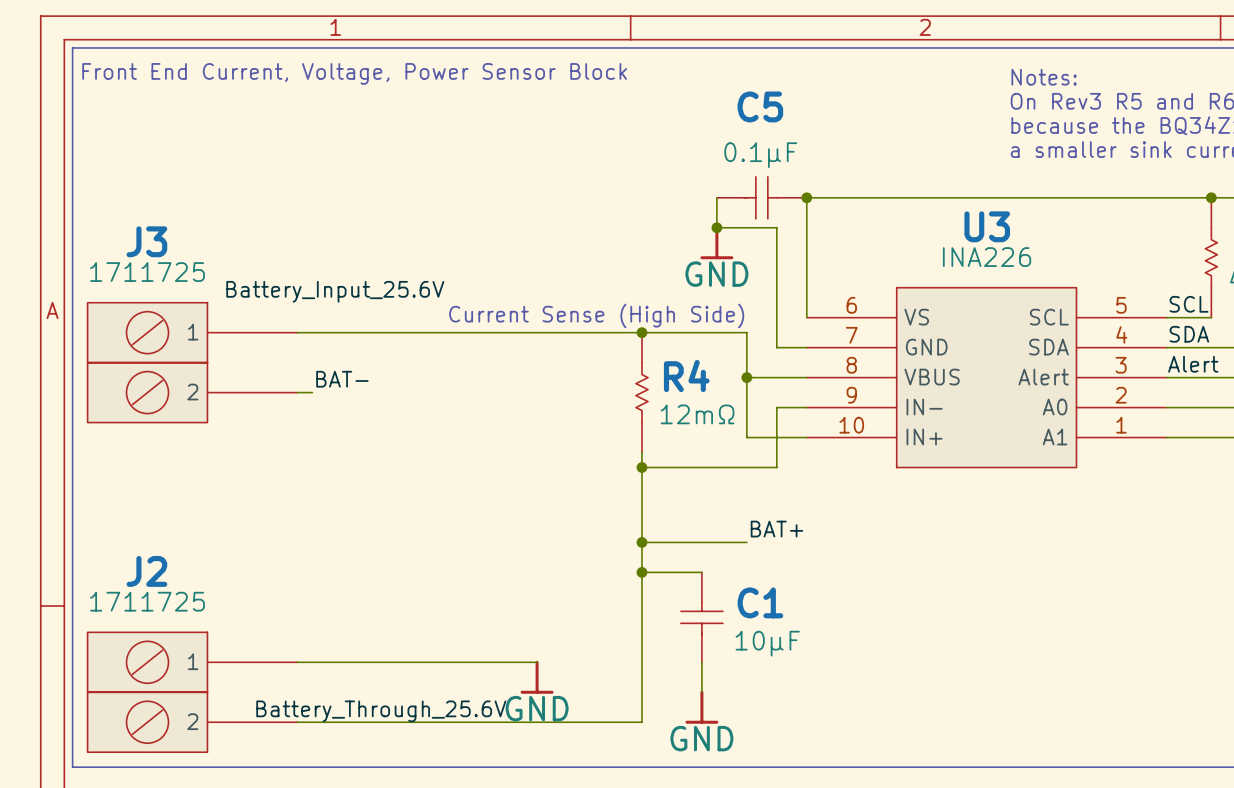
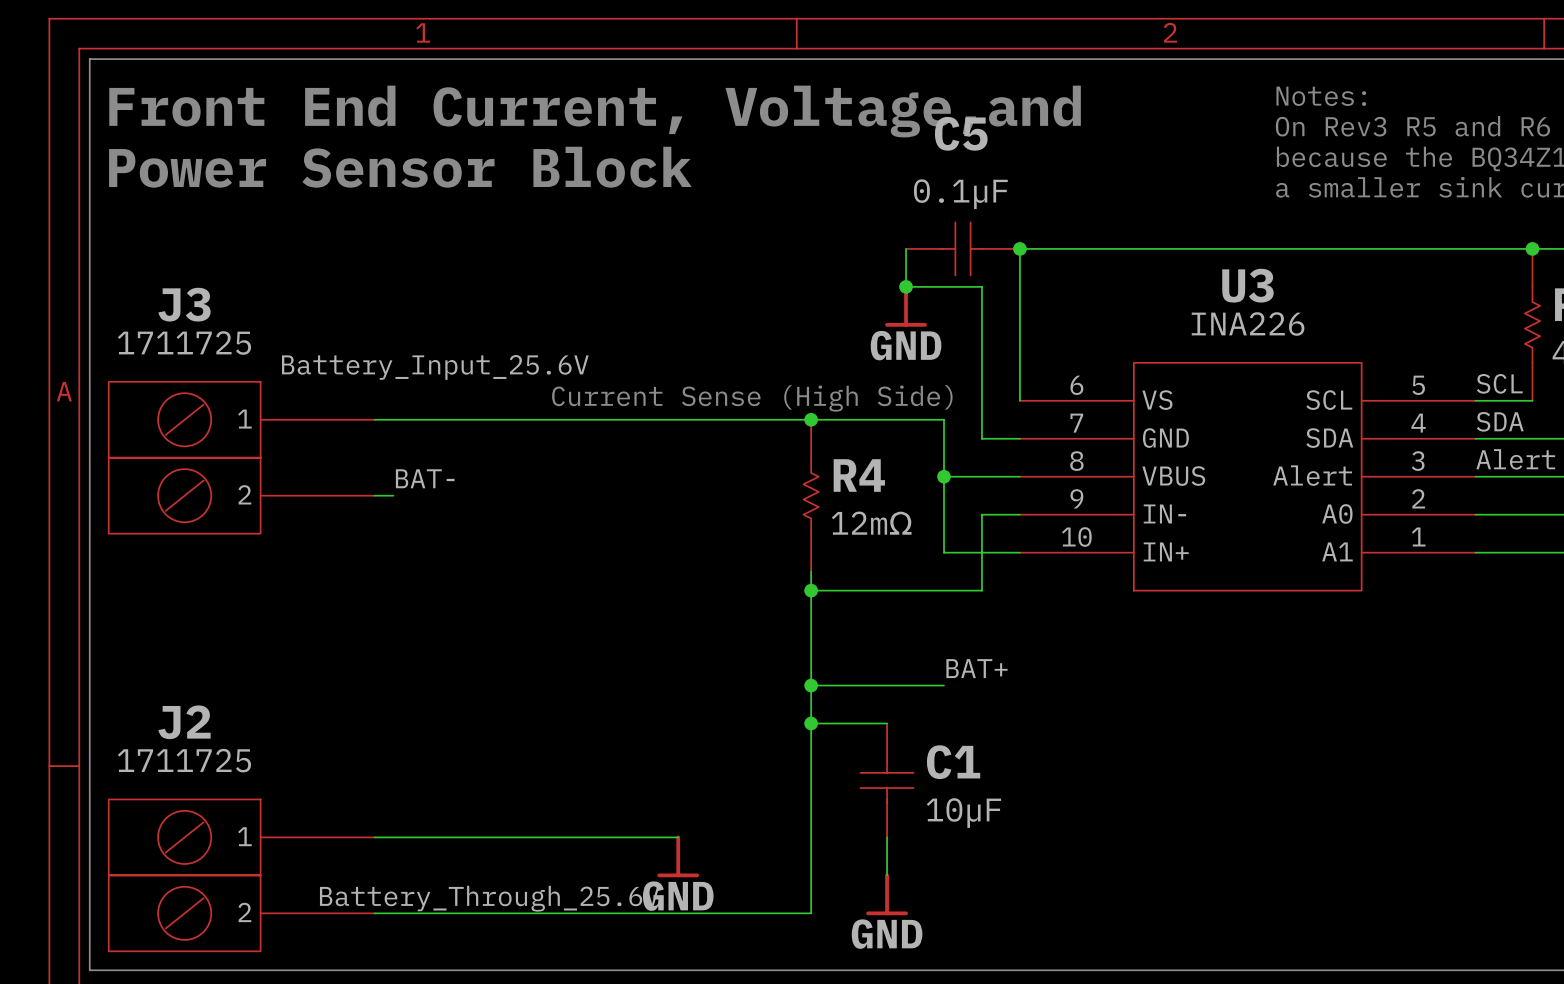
text: Front End Current, Voltage, Power Sensor Block (354, 73) -> Front End Current, Voltage,and (595, 111)
text: none -> Power Sensor Block (400, 167)

